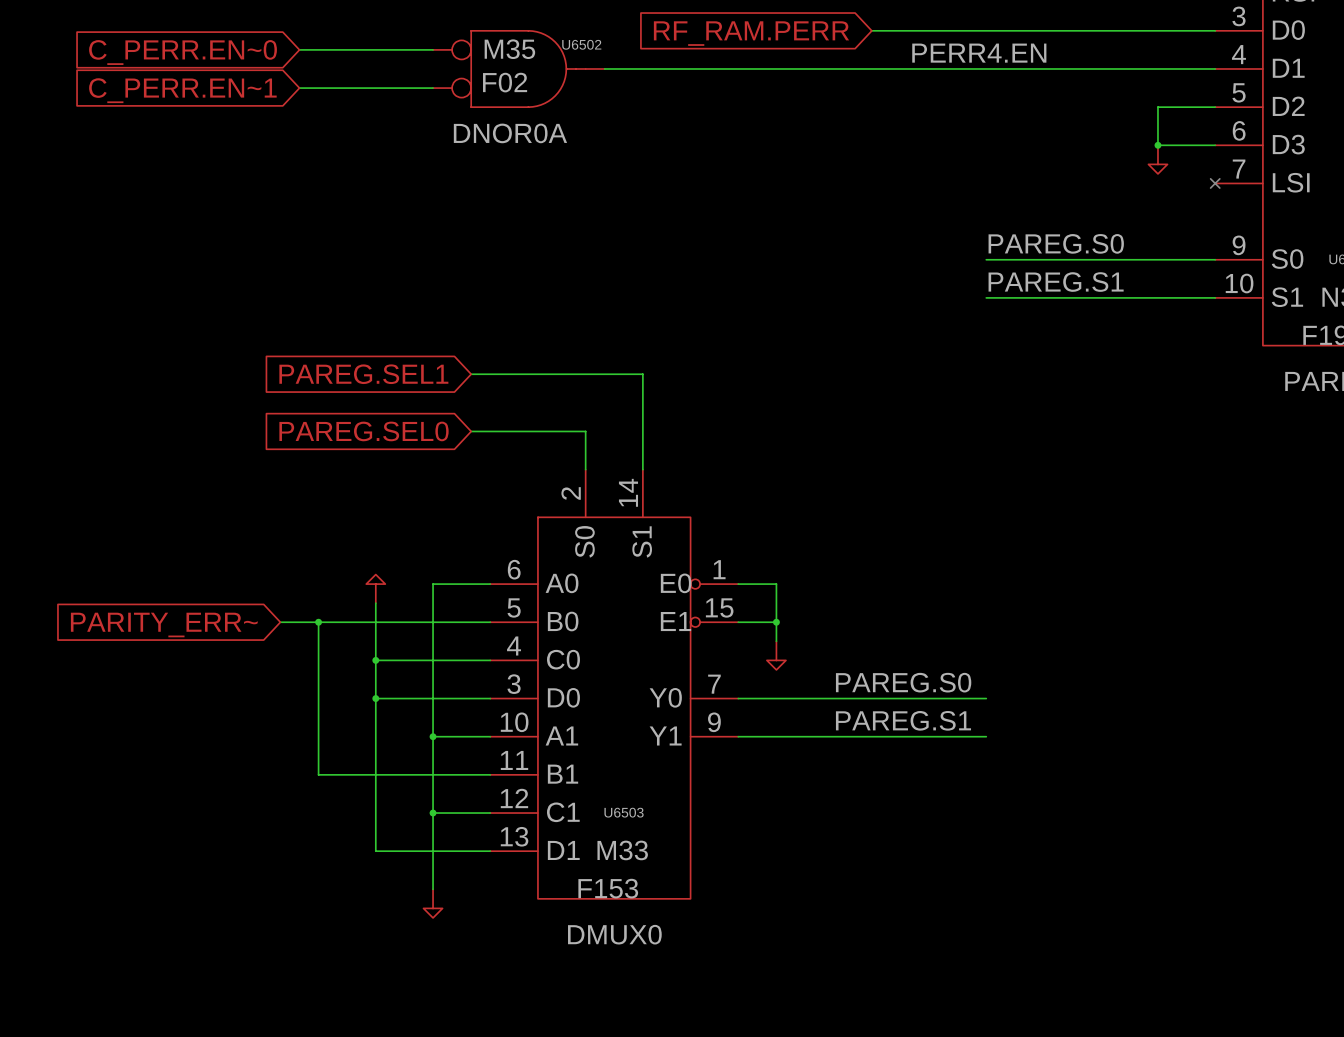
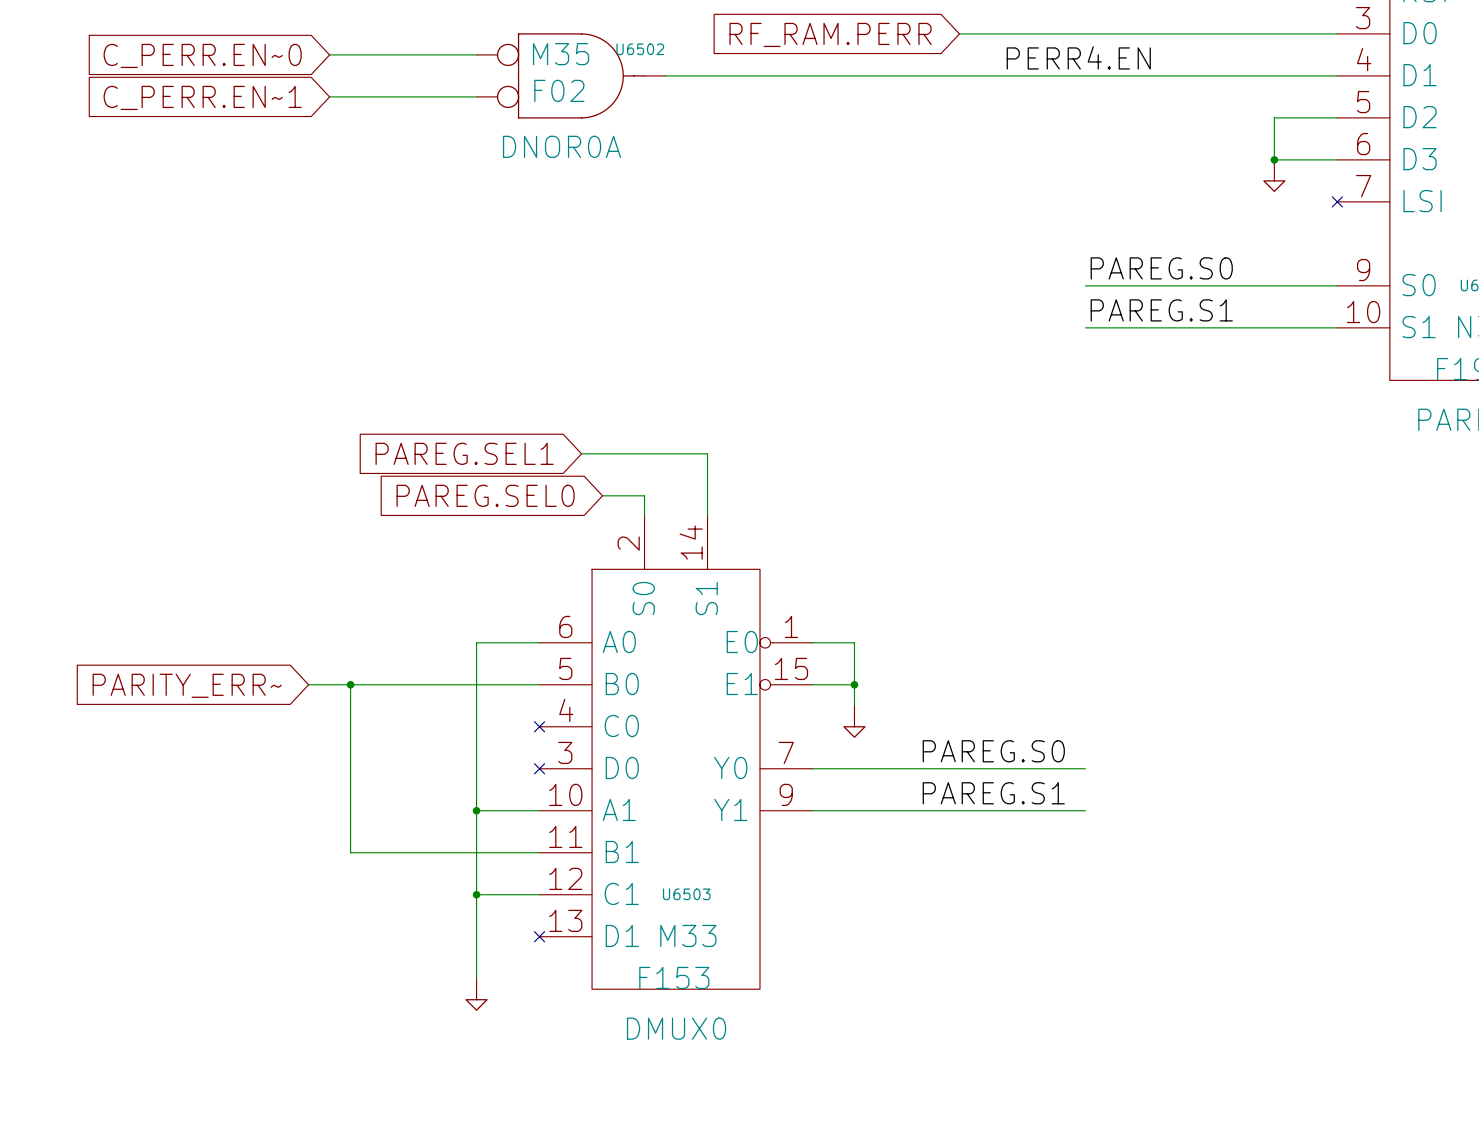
global label position: PAREG.SEL1 (363, 374) -> PAREG.SEL1 (464, 453)
wire: (471, 374) (642, 374) (642, 412) -> (581, 453) (707, 453)
global label position: PAREG.SEL0 (364, 431) -> PAREG.SEL0 (485, 495)
wire: (471, 431) (585, 431) (585, 450) -> (602, 495) (644, 495)
power symbol: (375, 588) -> none
wire: (375, 603) (375, 851) (490, 851) -> none
wire: (375, 660) (490, 660) -> none
junction: (375, 660) -> none
no-connect mark: none -> (539, 726)
wire: (375, 698) (490, 698) -> none
junction: (375, 698) -> none
no-connect mark: none -> (539, 768)
no-connect mark: none -> (539, 936)

